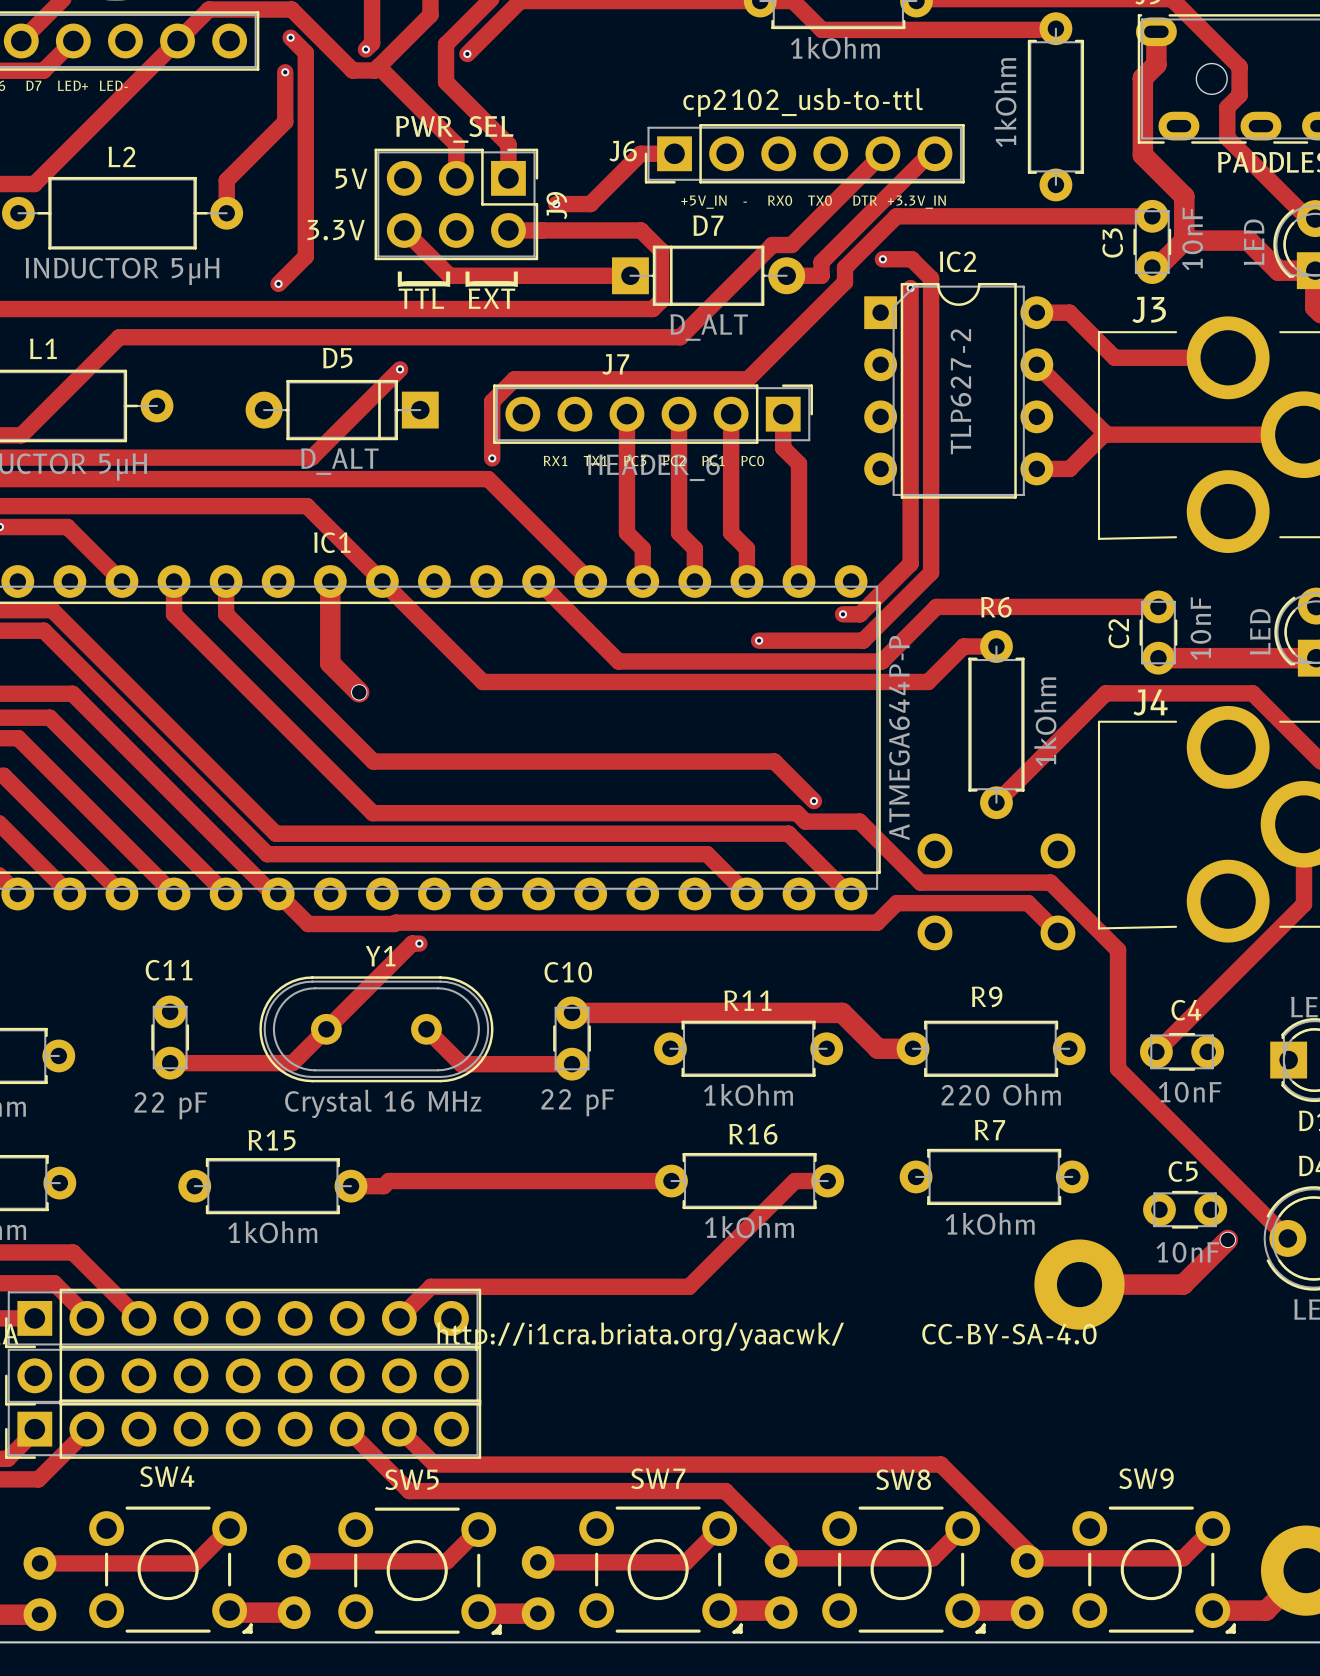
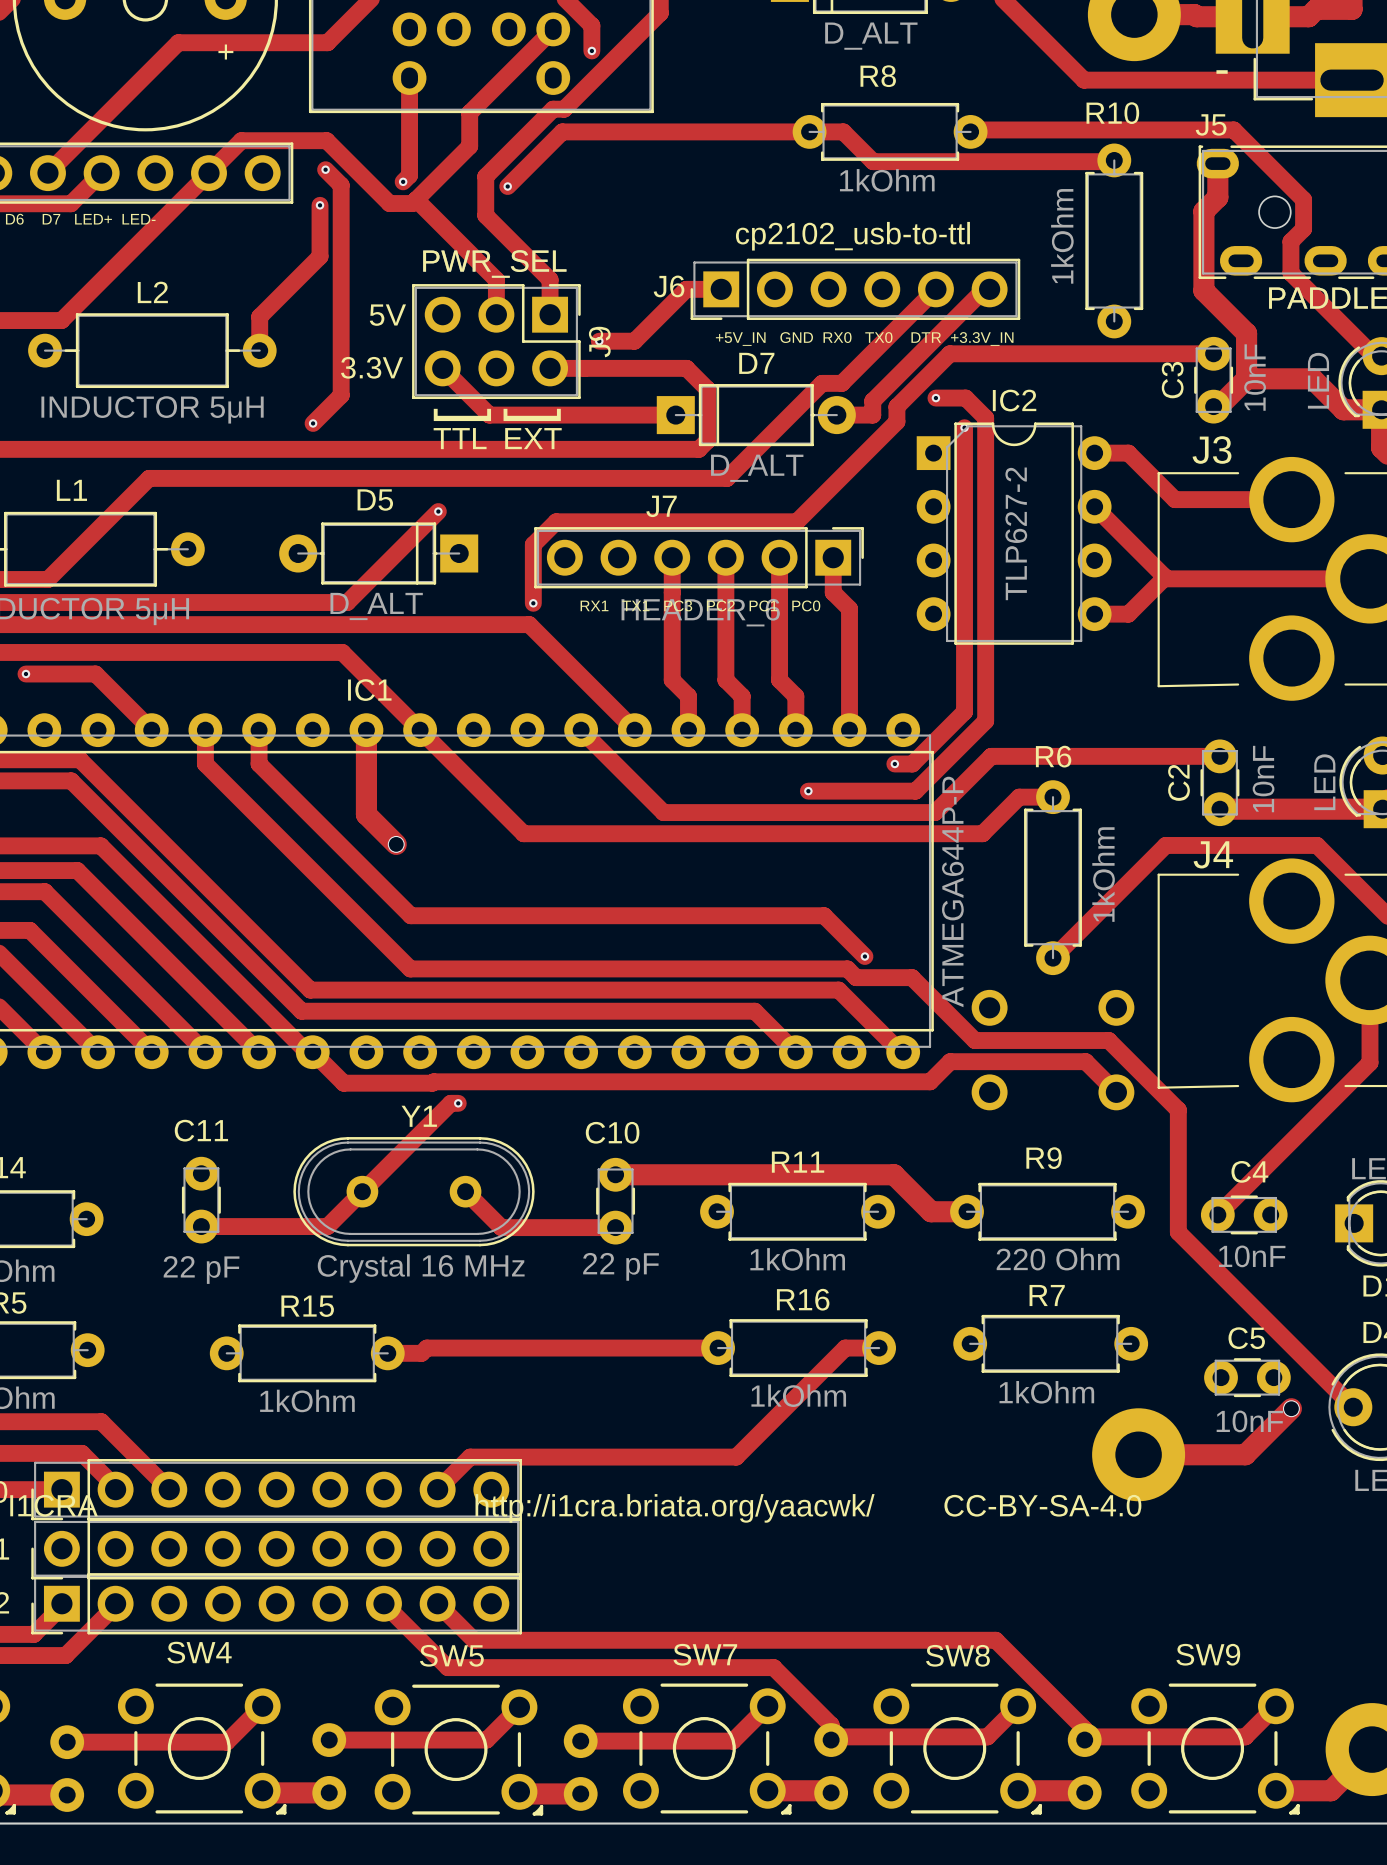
text: +5V_IN - RX0 TX0 DTR +3.3V_IN (813, 202) -> +5V_IN GND RX0 TX0 DTR +3.3V_IN (864, 339)

